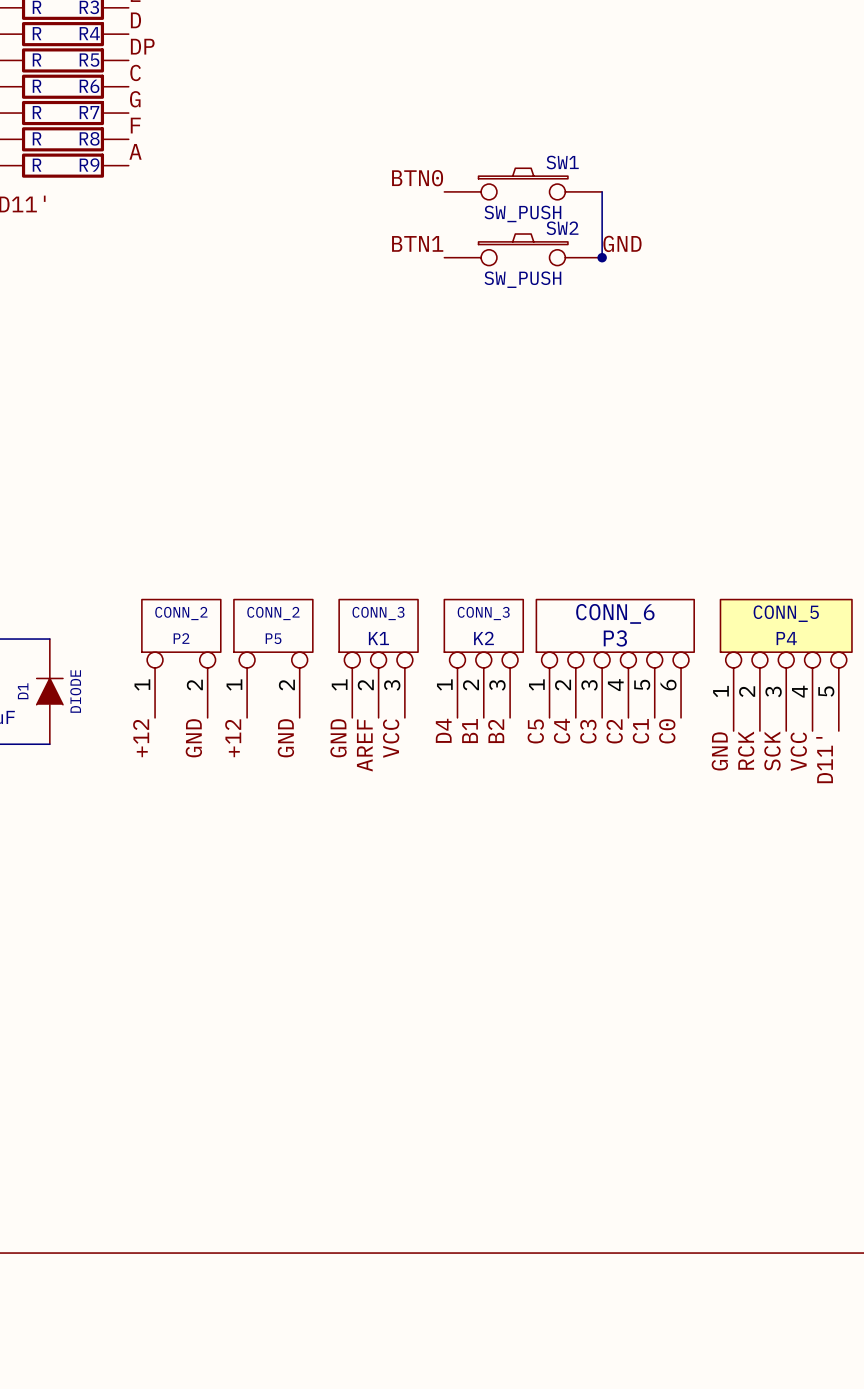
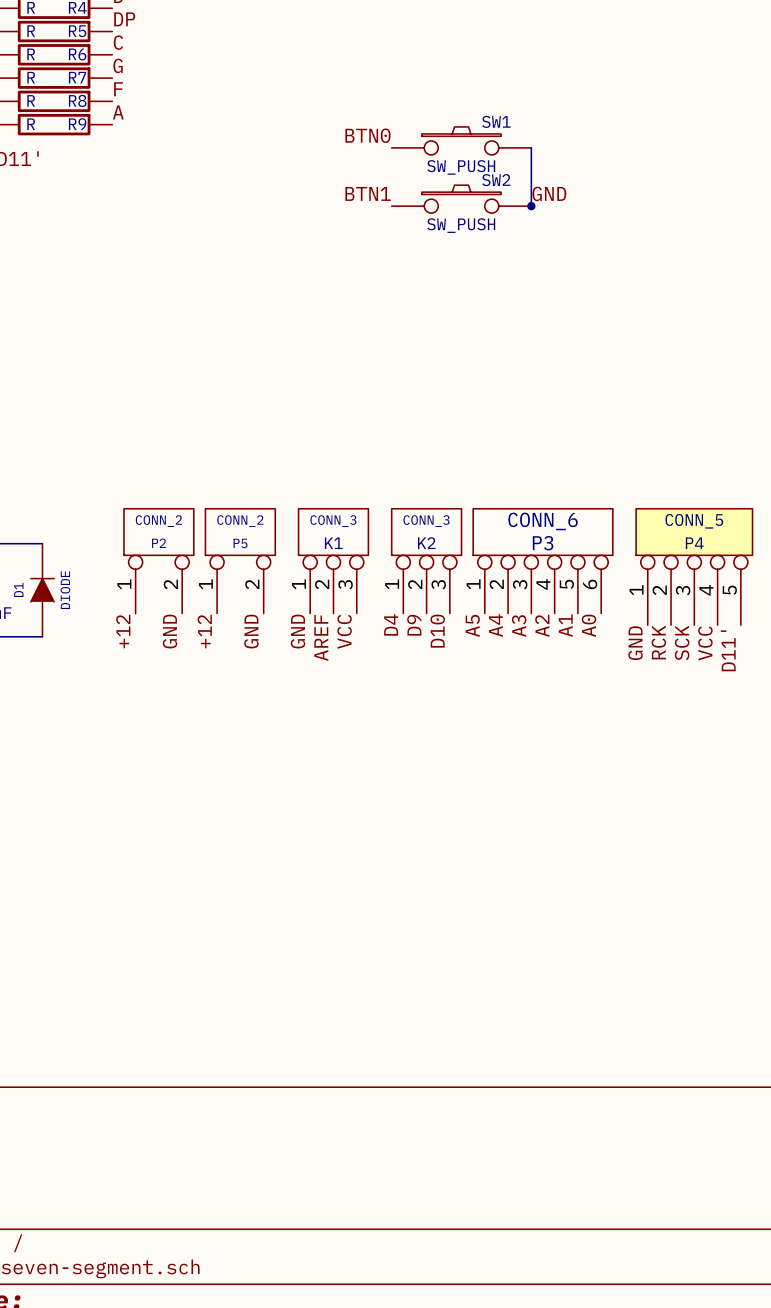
label: B1 (470, 731) -> D9 (414, 625)
label: B2 (496, 731) -> D10 (437, 631)
label: C5 (535, 731) -> A5 (472, 625)
label: C4 (562, 731) -> A4 (495, 625)
label: C3 (588, 731) -> A3 (519, 626)
label: C2 (614, 731) -> A2 (542, 625)
label: C1 (640, 731) -> A1 (565, 625)
label: C0 (667, 731) -> A0 (589, 625)

